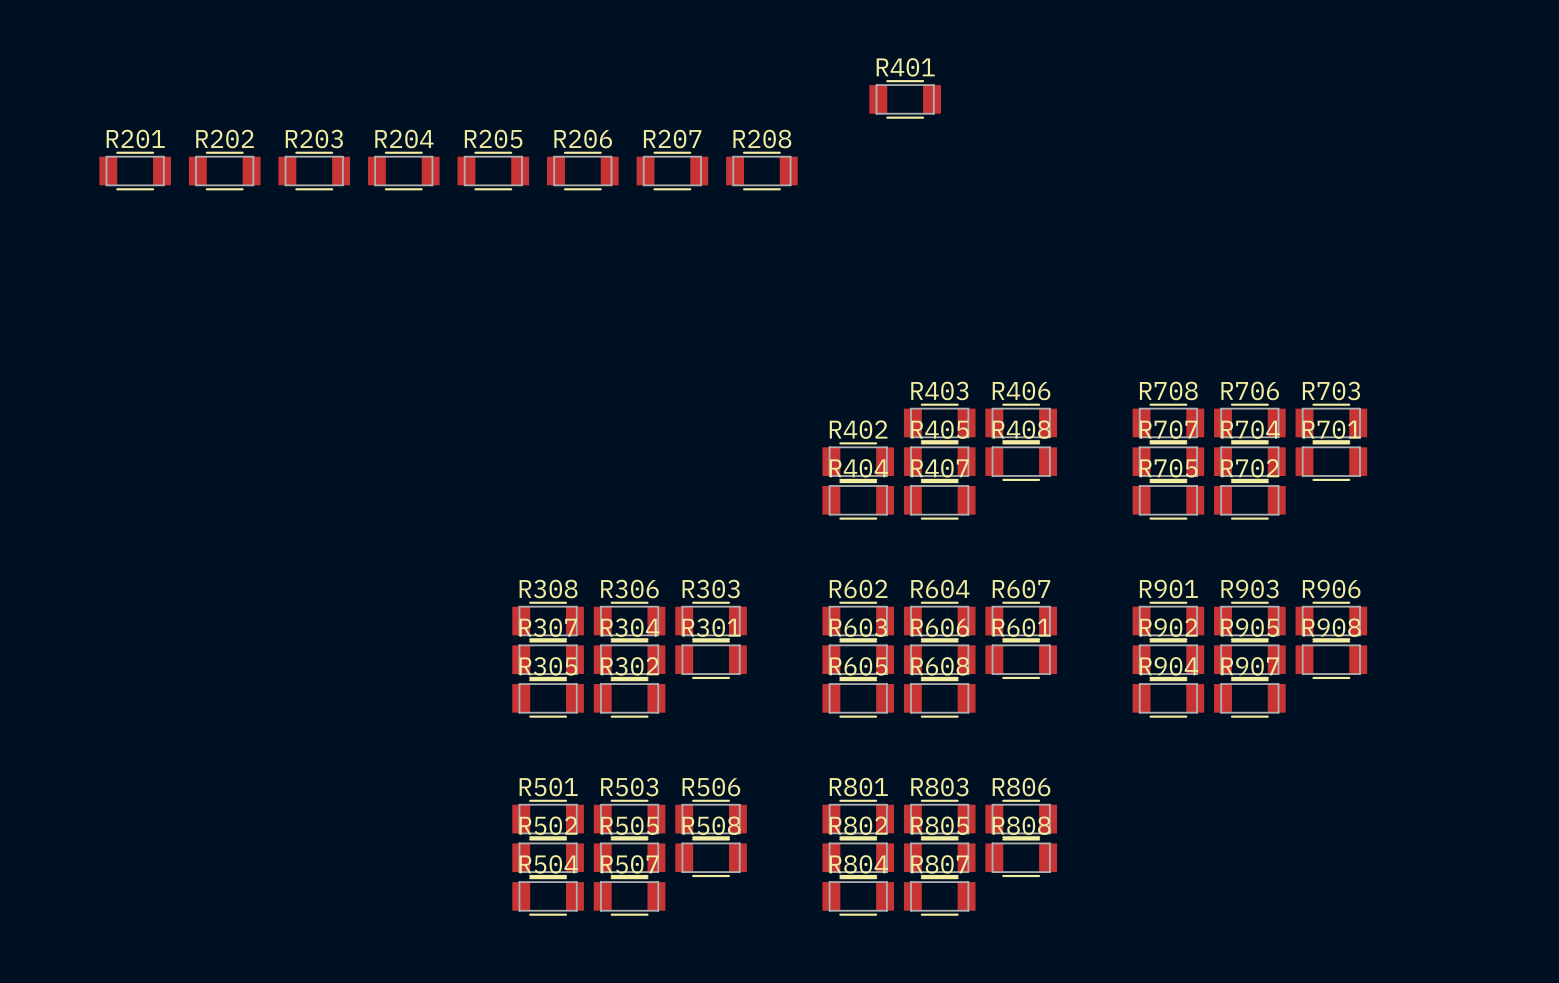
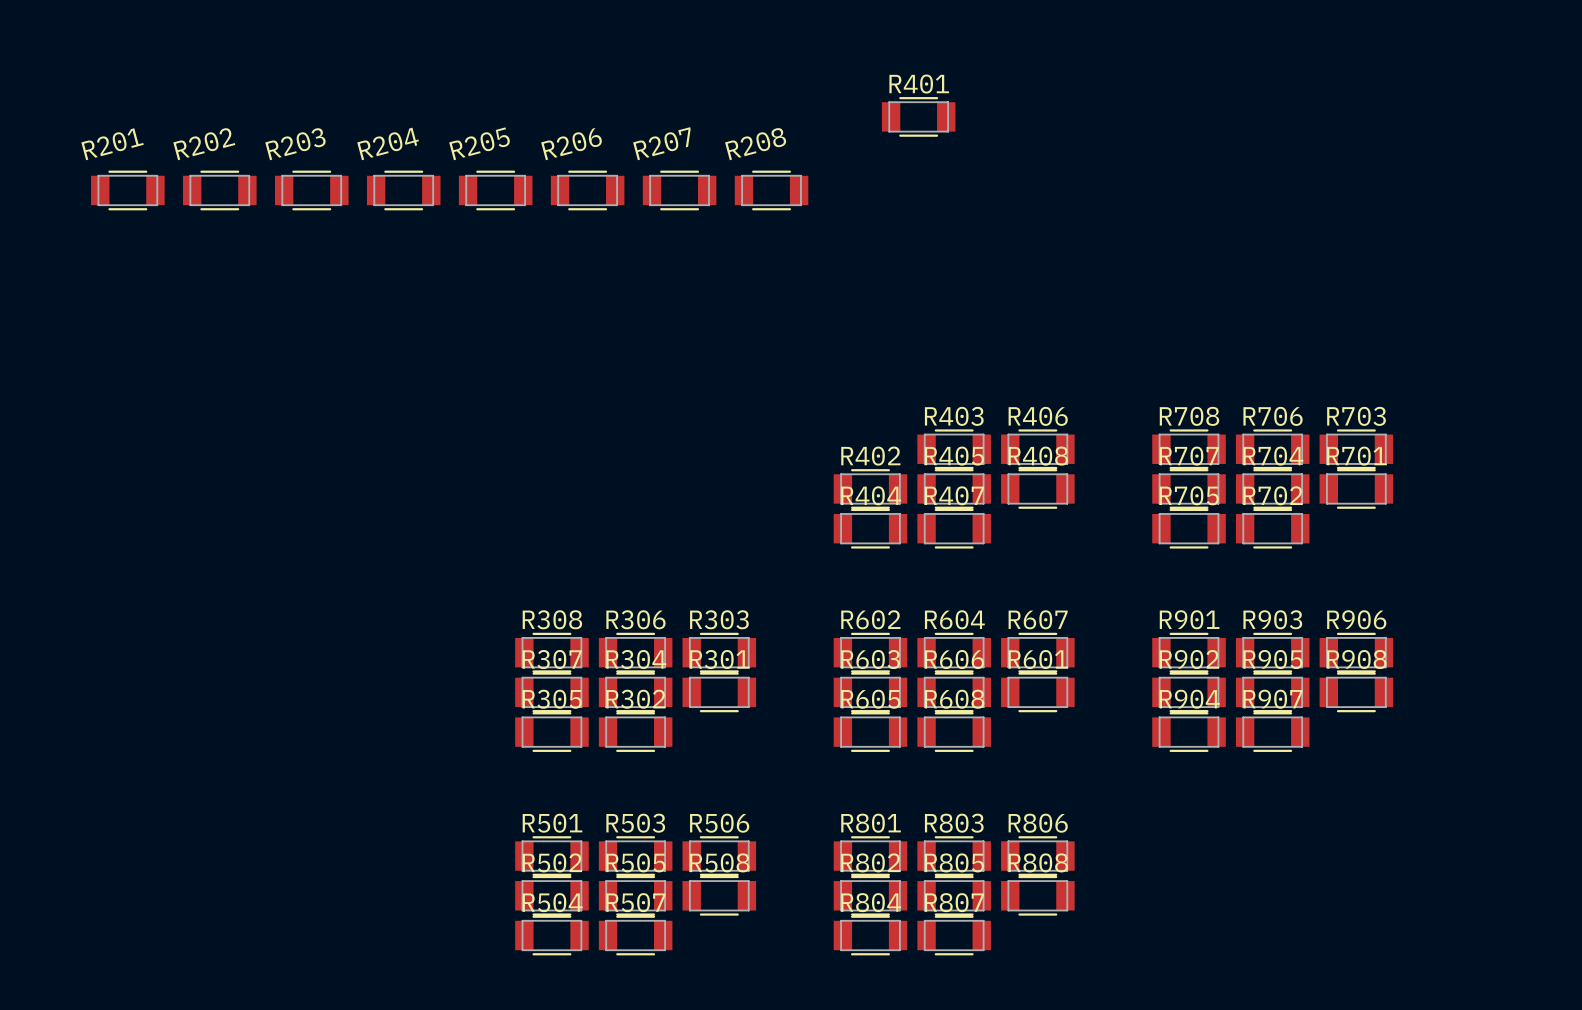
R201 name rotation: 0° (135, 139) -> 15° counterclockwise (112, 144)
R202 name rotation: 0° (225, 139) -> 15° counterclockwise (204, 144)
R203 name rotation: 0° (314, 139) -> 15° counterclockwise (295, 144)
R204 name rotation: 0° (404, 139) -> 15° counterclockwise (388, 143)
R205 name rotation: 0° (493, 139) -> 15° counterclockwise (479, 143)
R206 name rotation: 0° (583, 139) -> 15° counterclockwise (571, 144)
R207 name rotation: 0° (672, 139) -> 15° counterclockwise (661, 143)
R208 name rotation: 0° (762, 139) -> 15° counterclockwise (755, 143)

